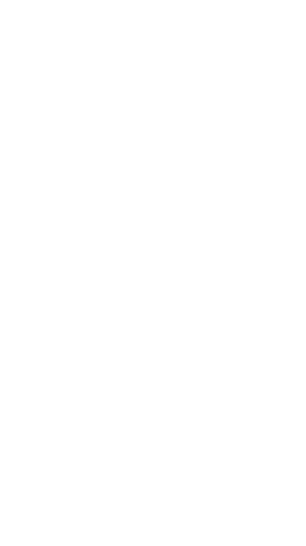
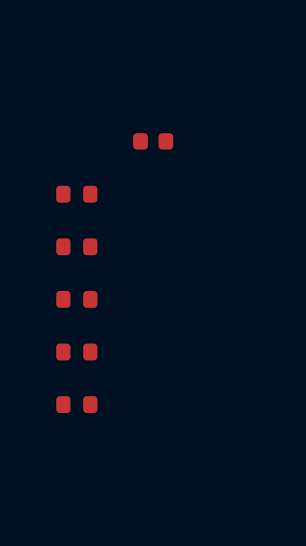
part: none -> (153, 141)
part: none -> (76, 194)
part: none -> (76, 246)
part: none -> (76, 299)
part: none -> (76, 351)
part: none -> (76, 404)

